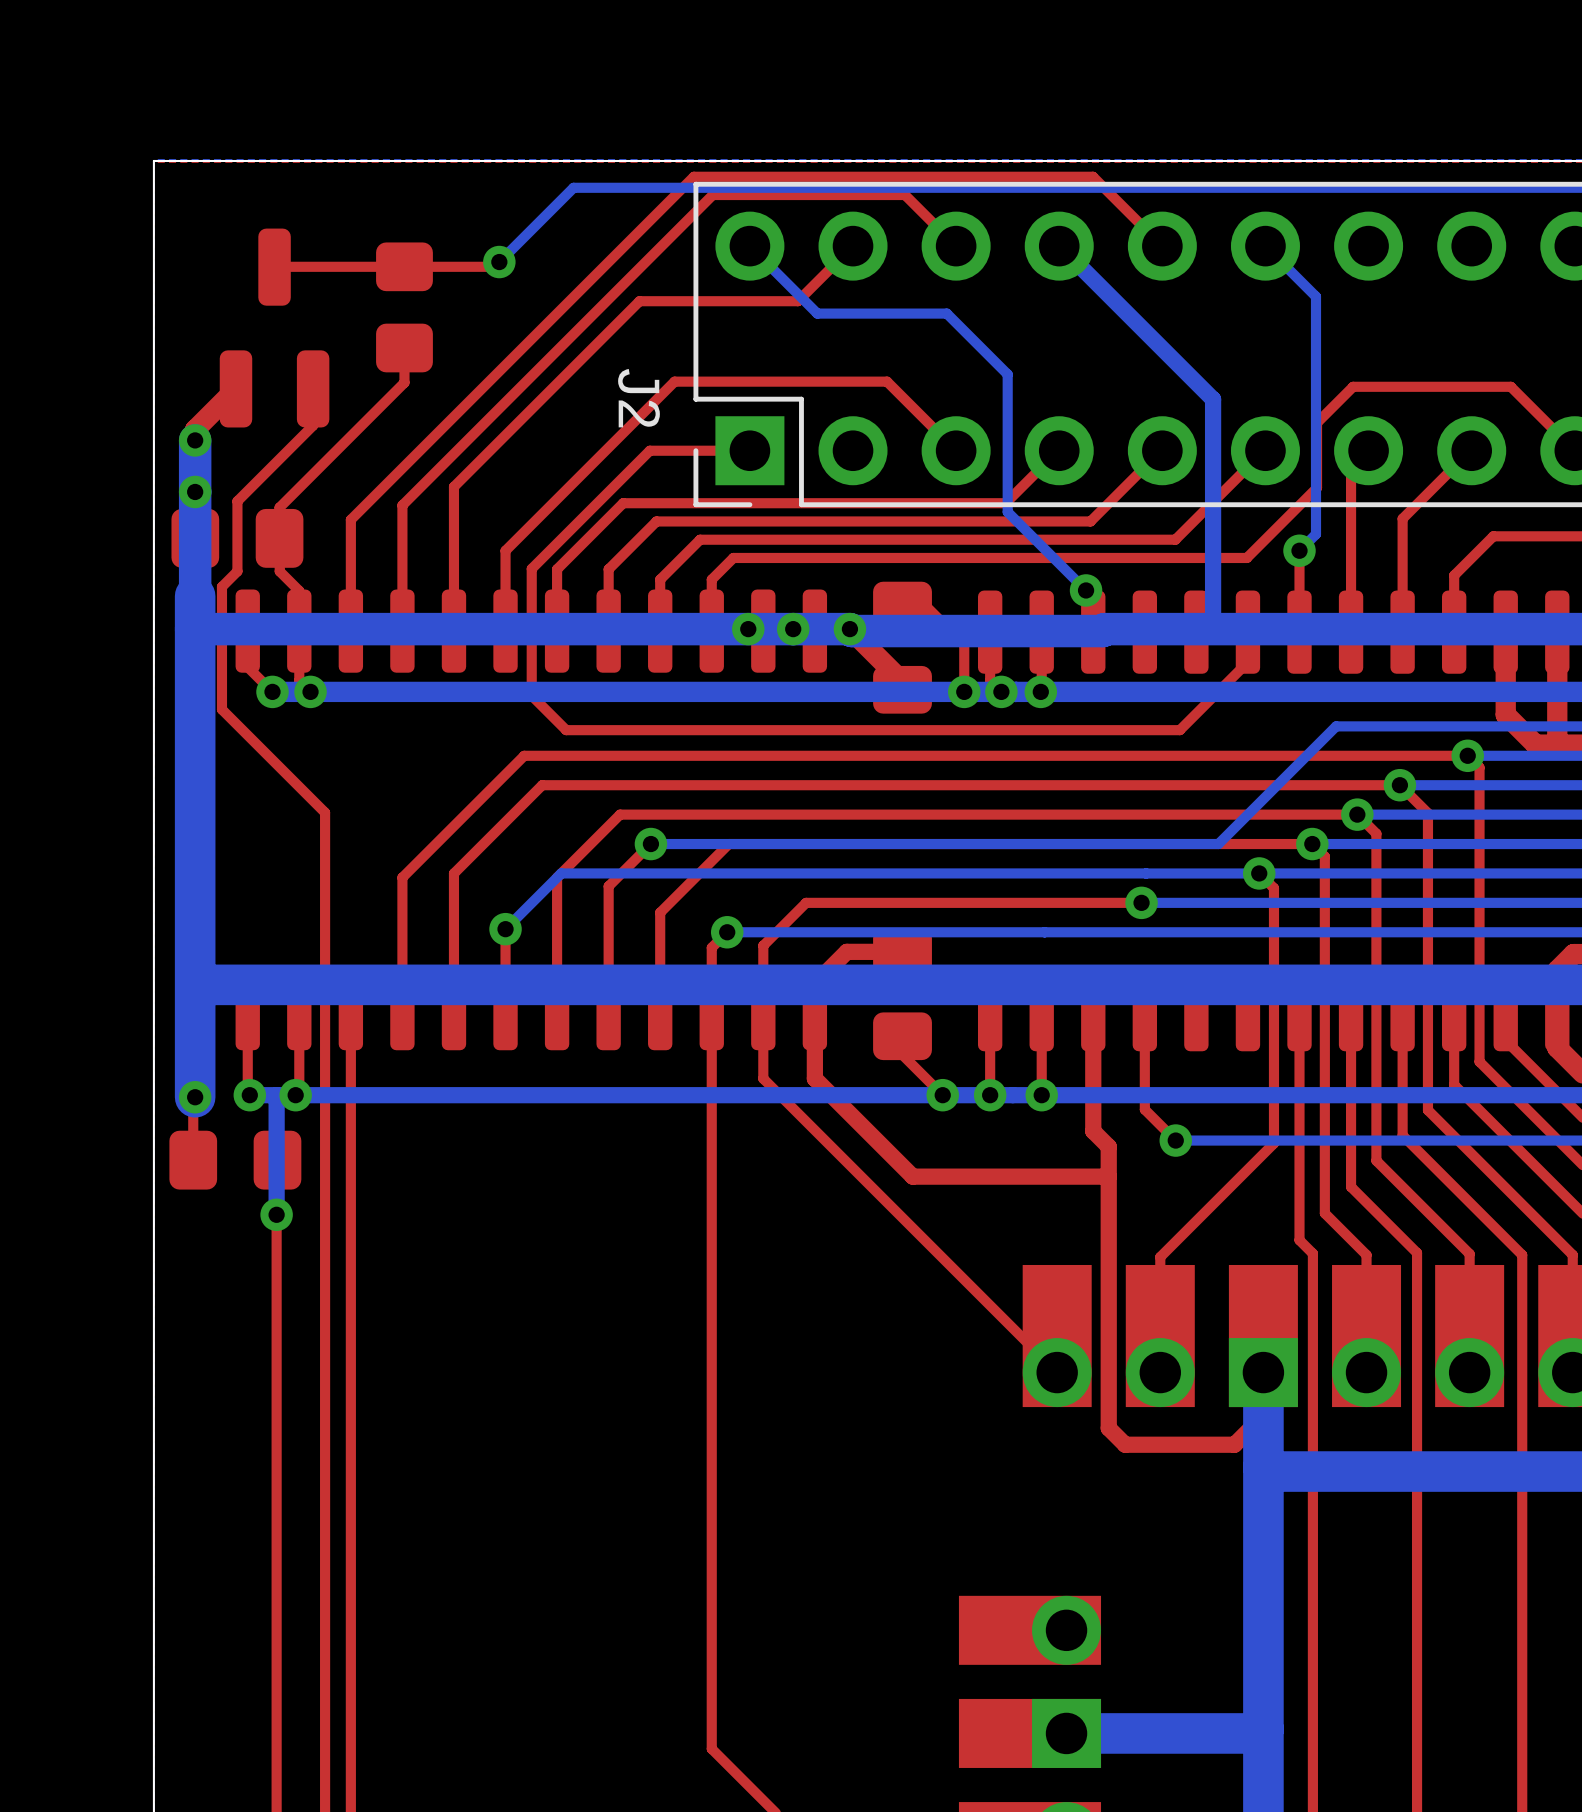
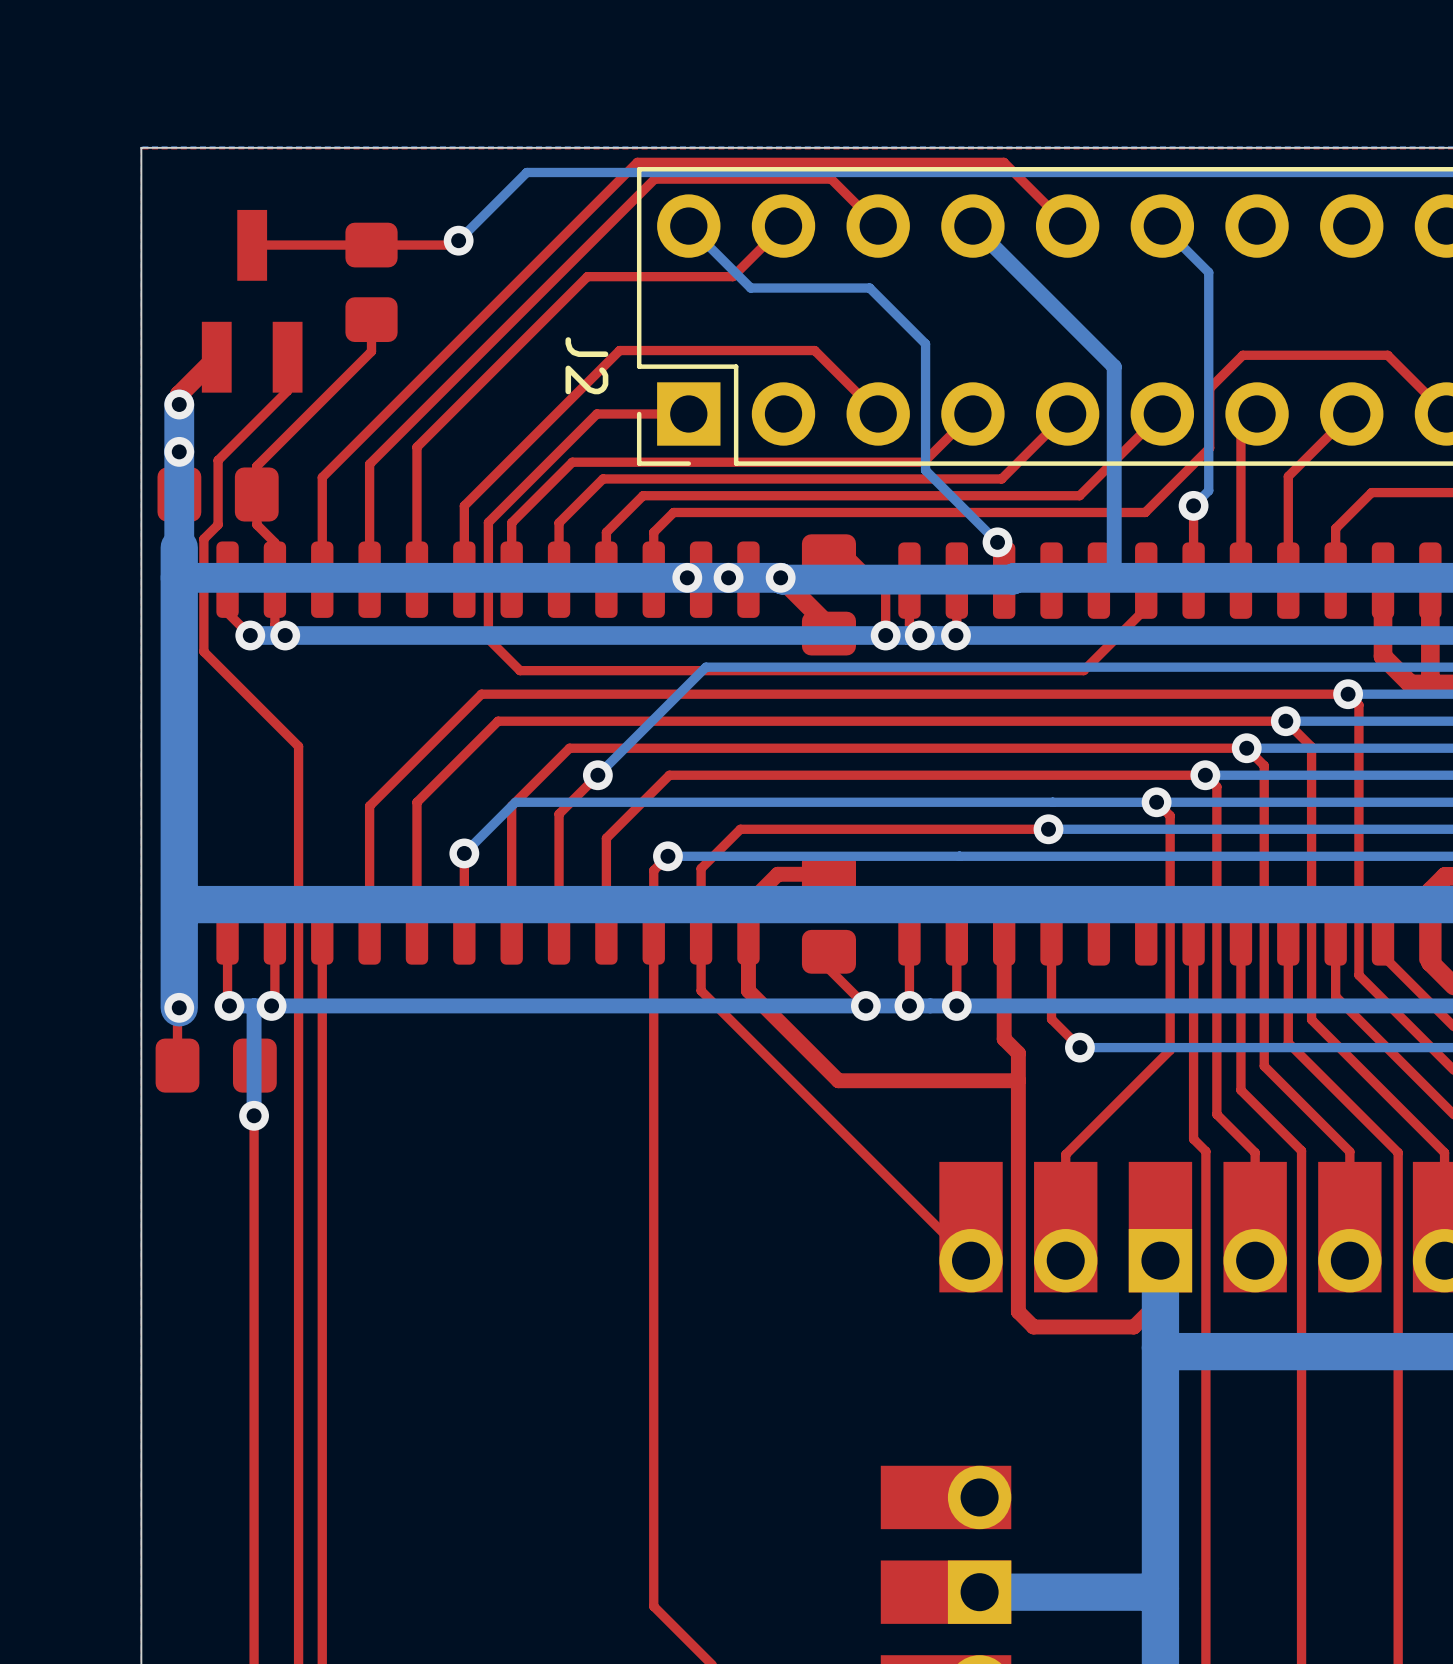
part footprint: [219, 228, 330, 428] -> [201, 209, 303, 393]
bottom track: (1336, 726) (1218, 844) (650, 844) -> (1227, 667) (705, 667) (597, 775)

